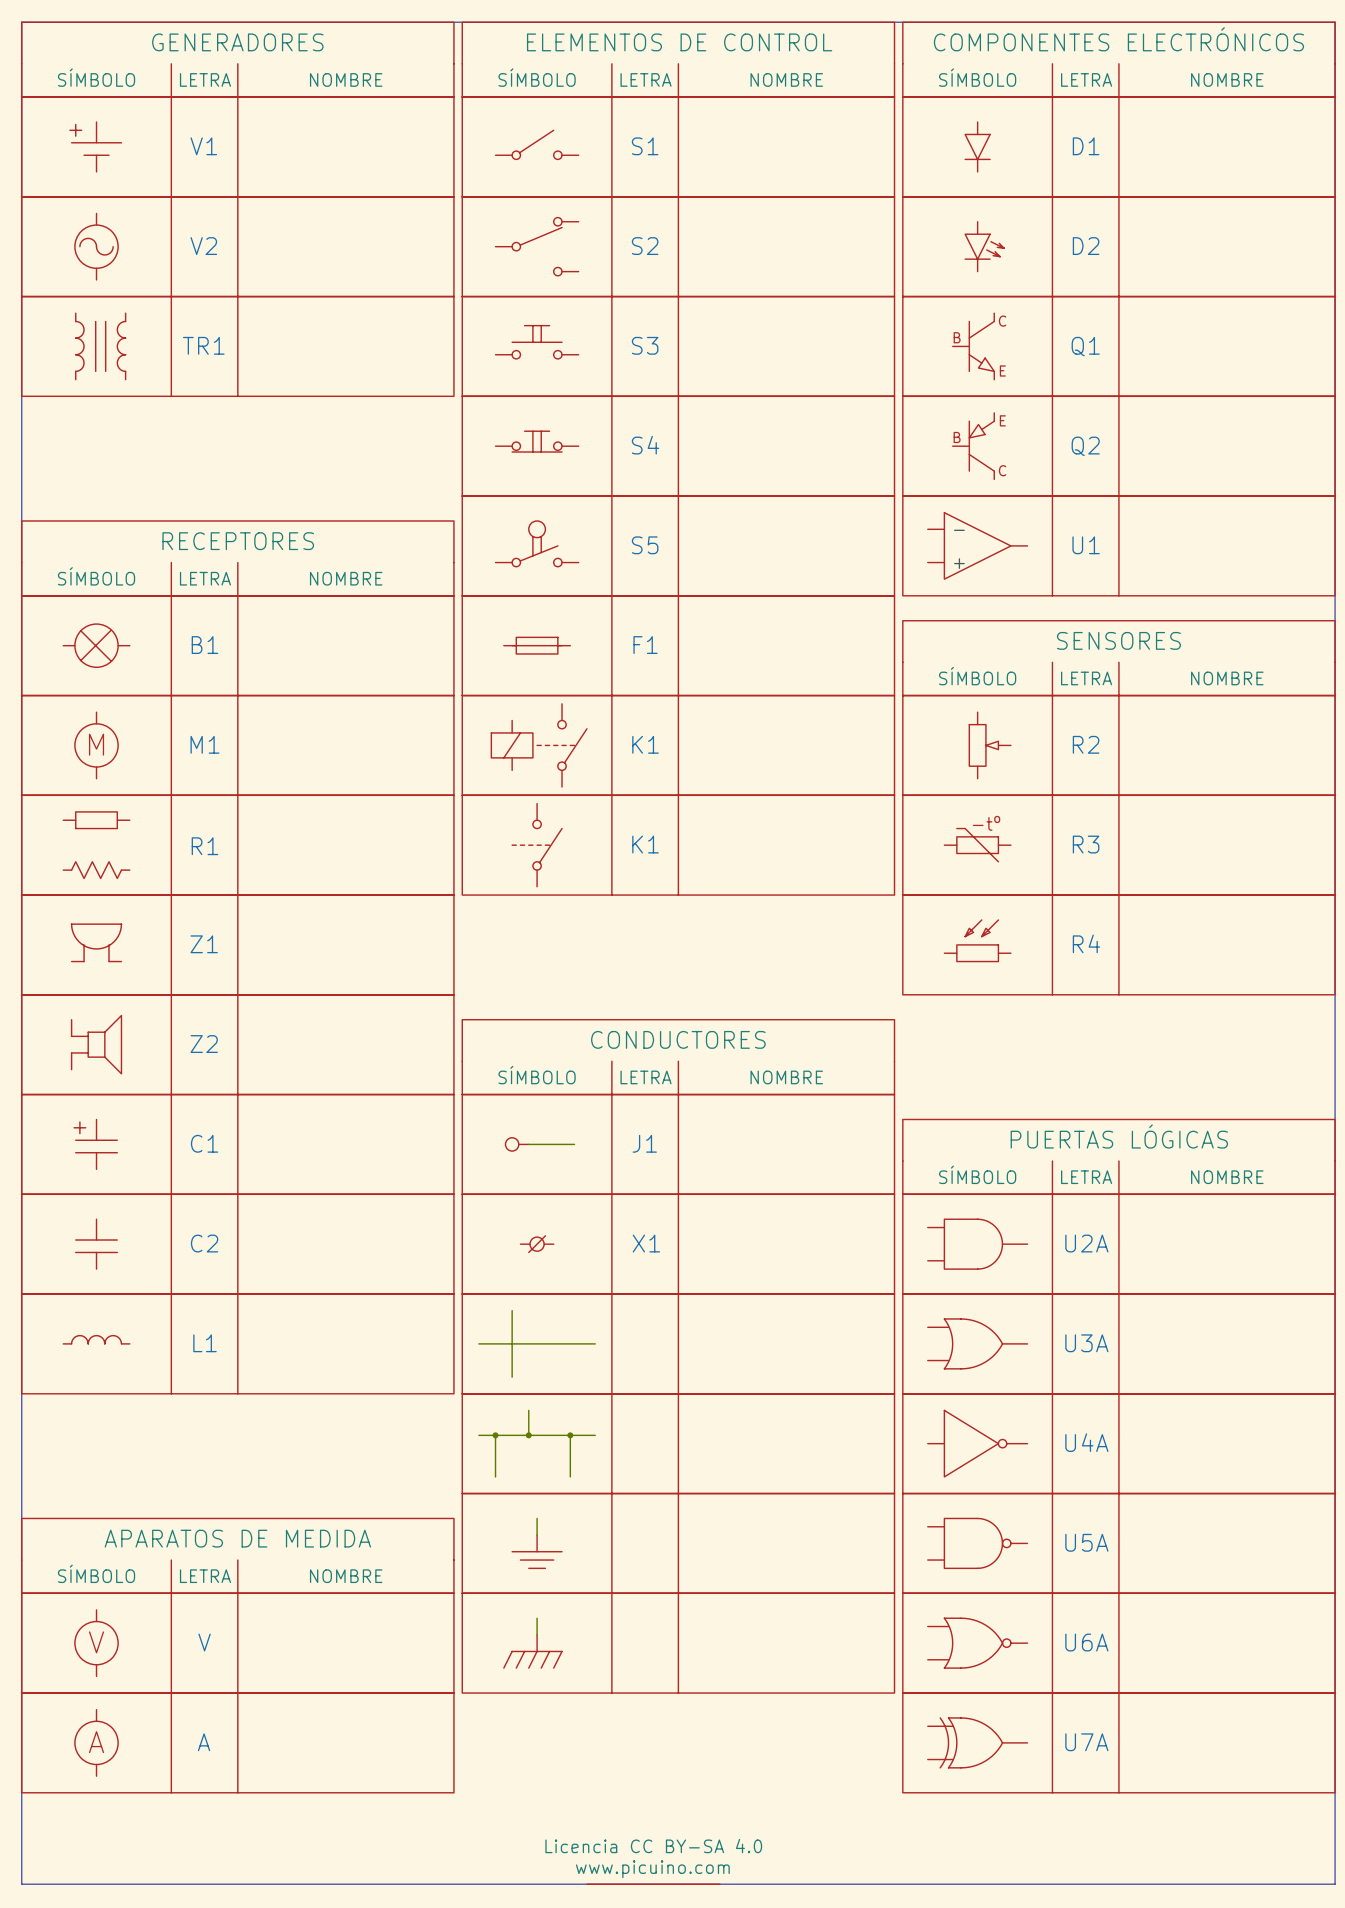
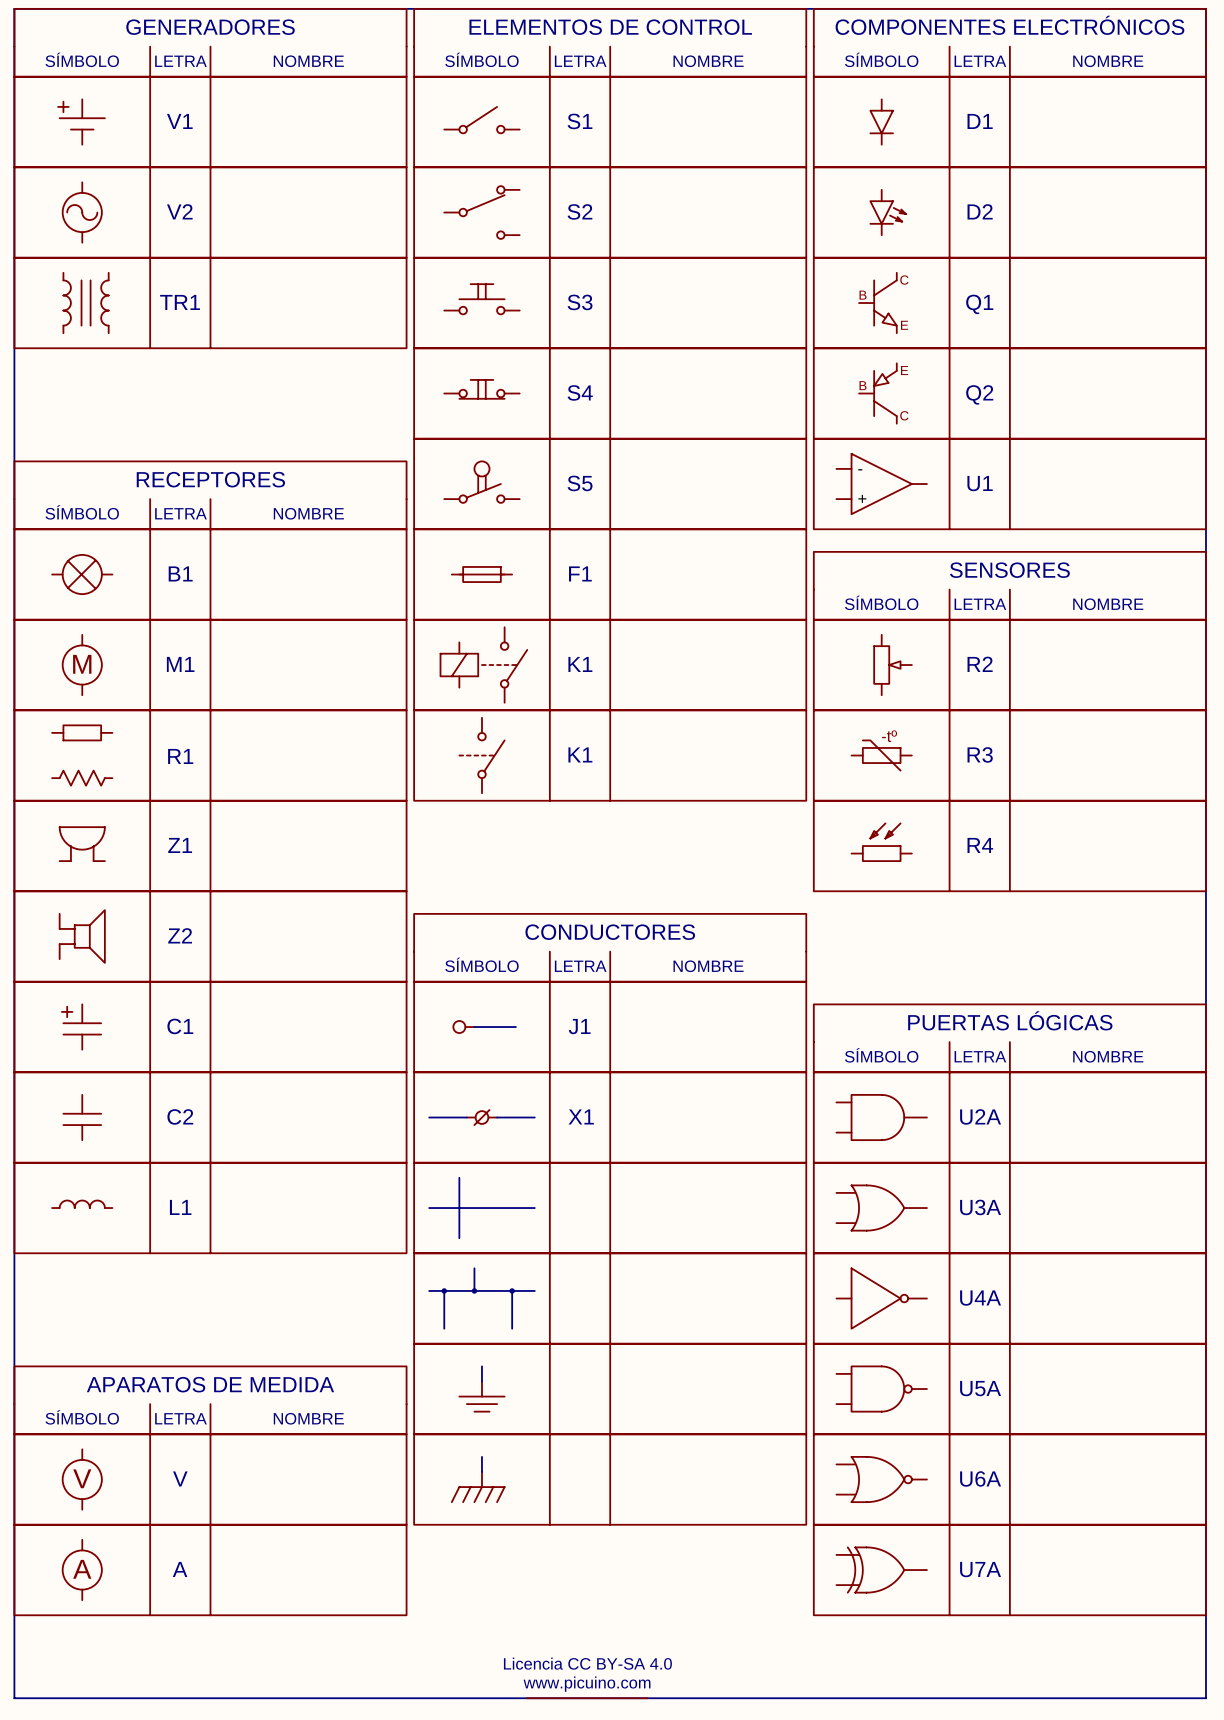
wire: none -> (429, 1117) (466, 1117)
wire: none -> (497, 1117) (534, 1117)

